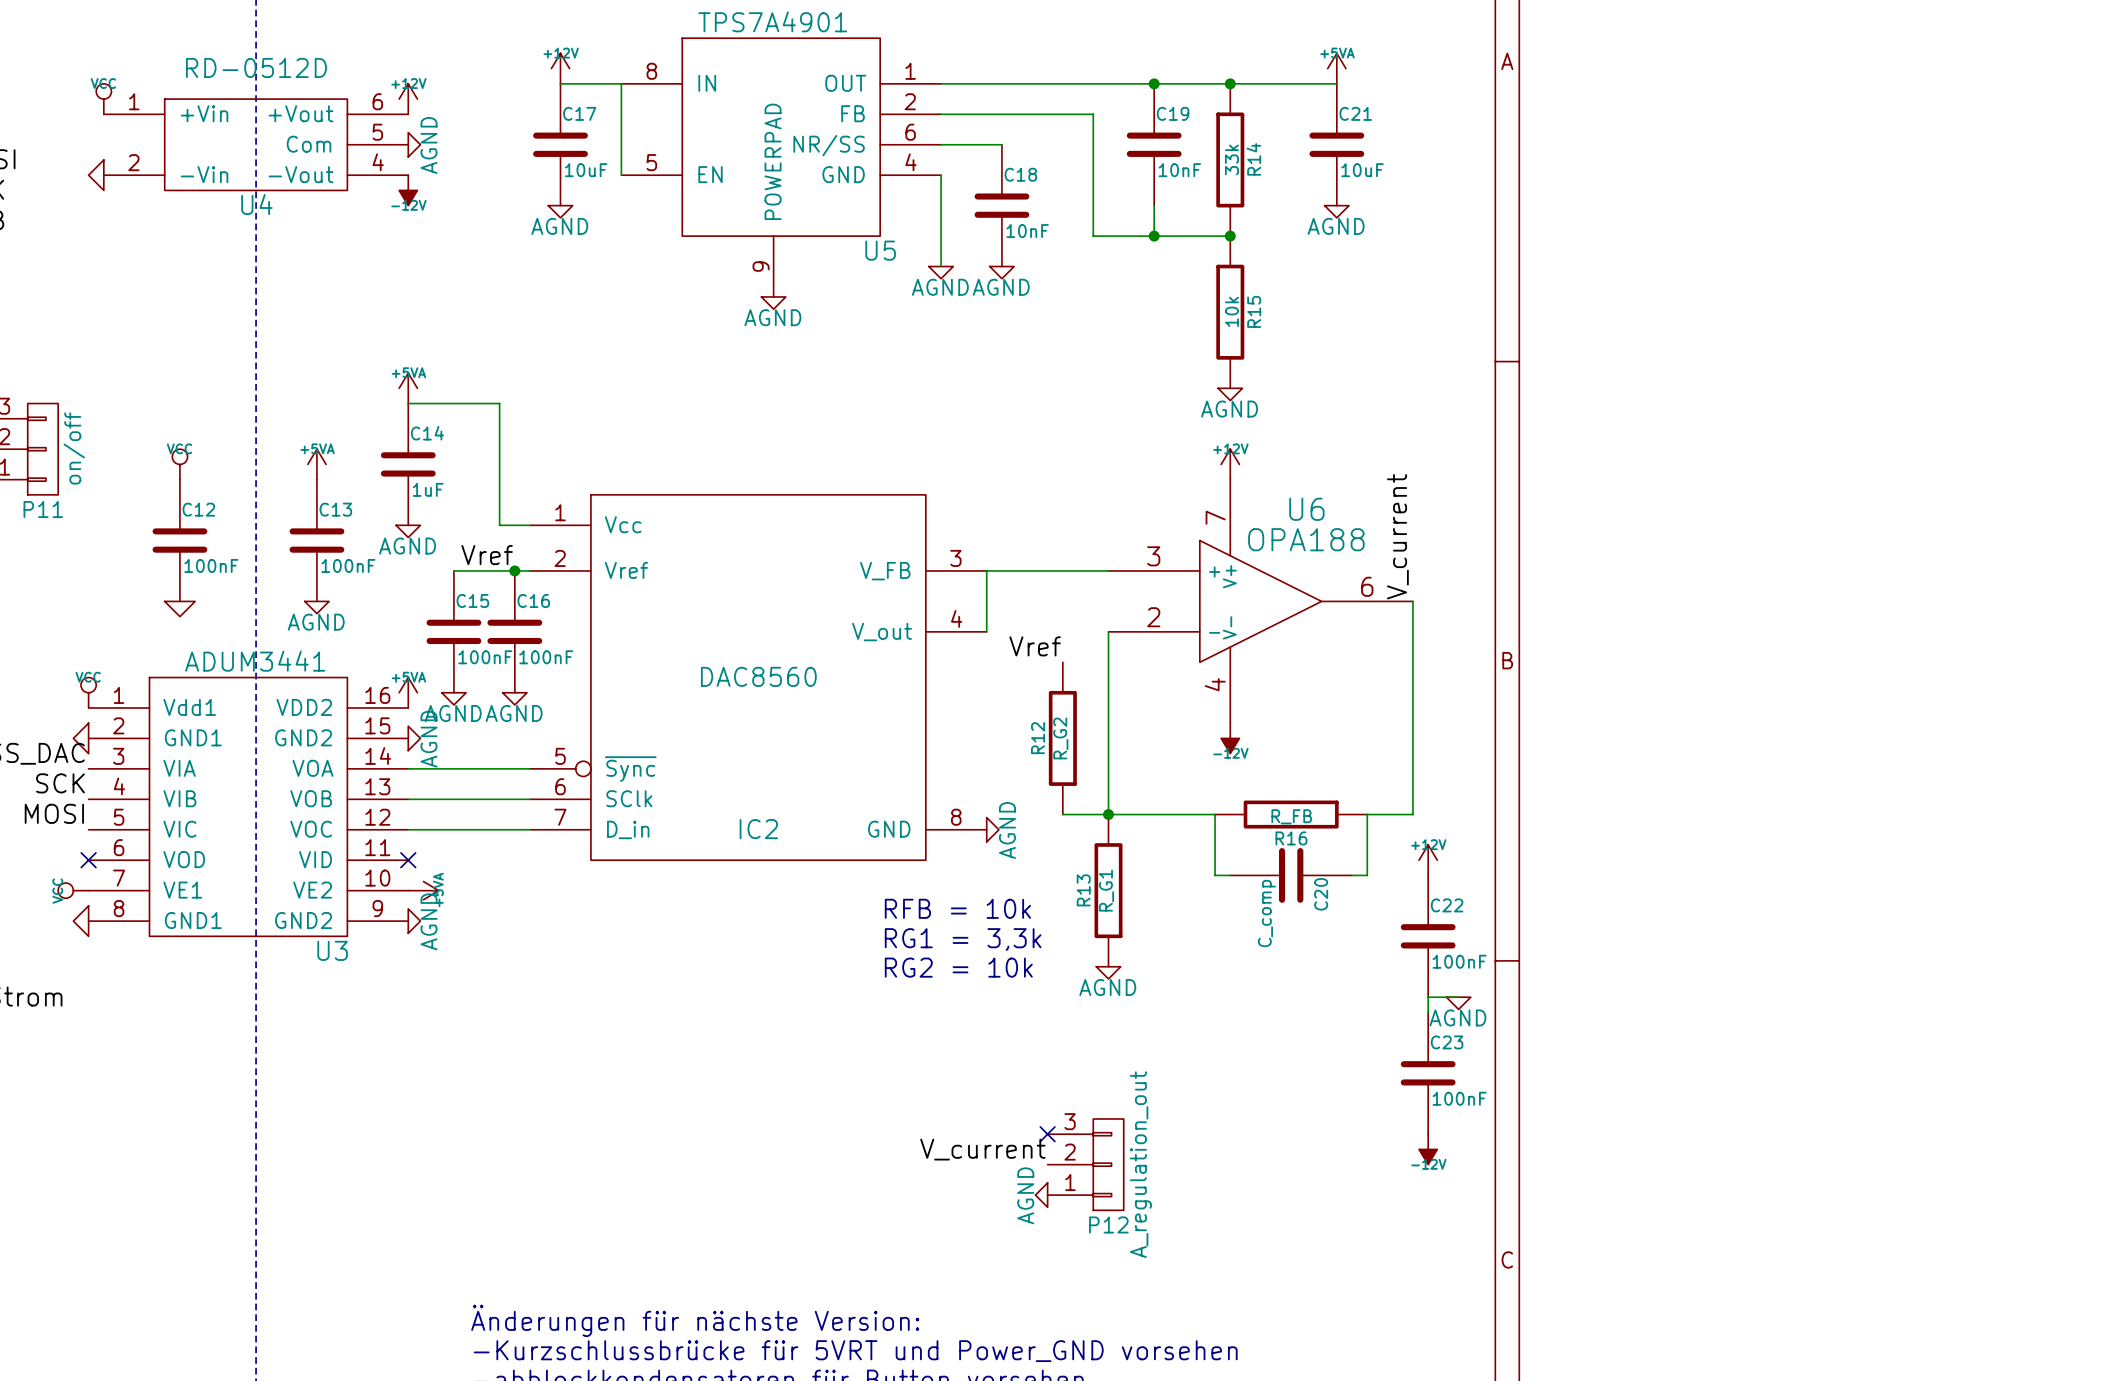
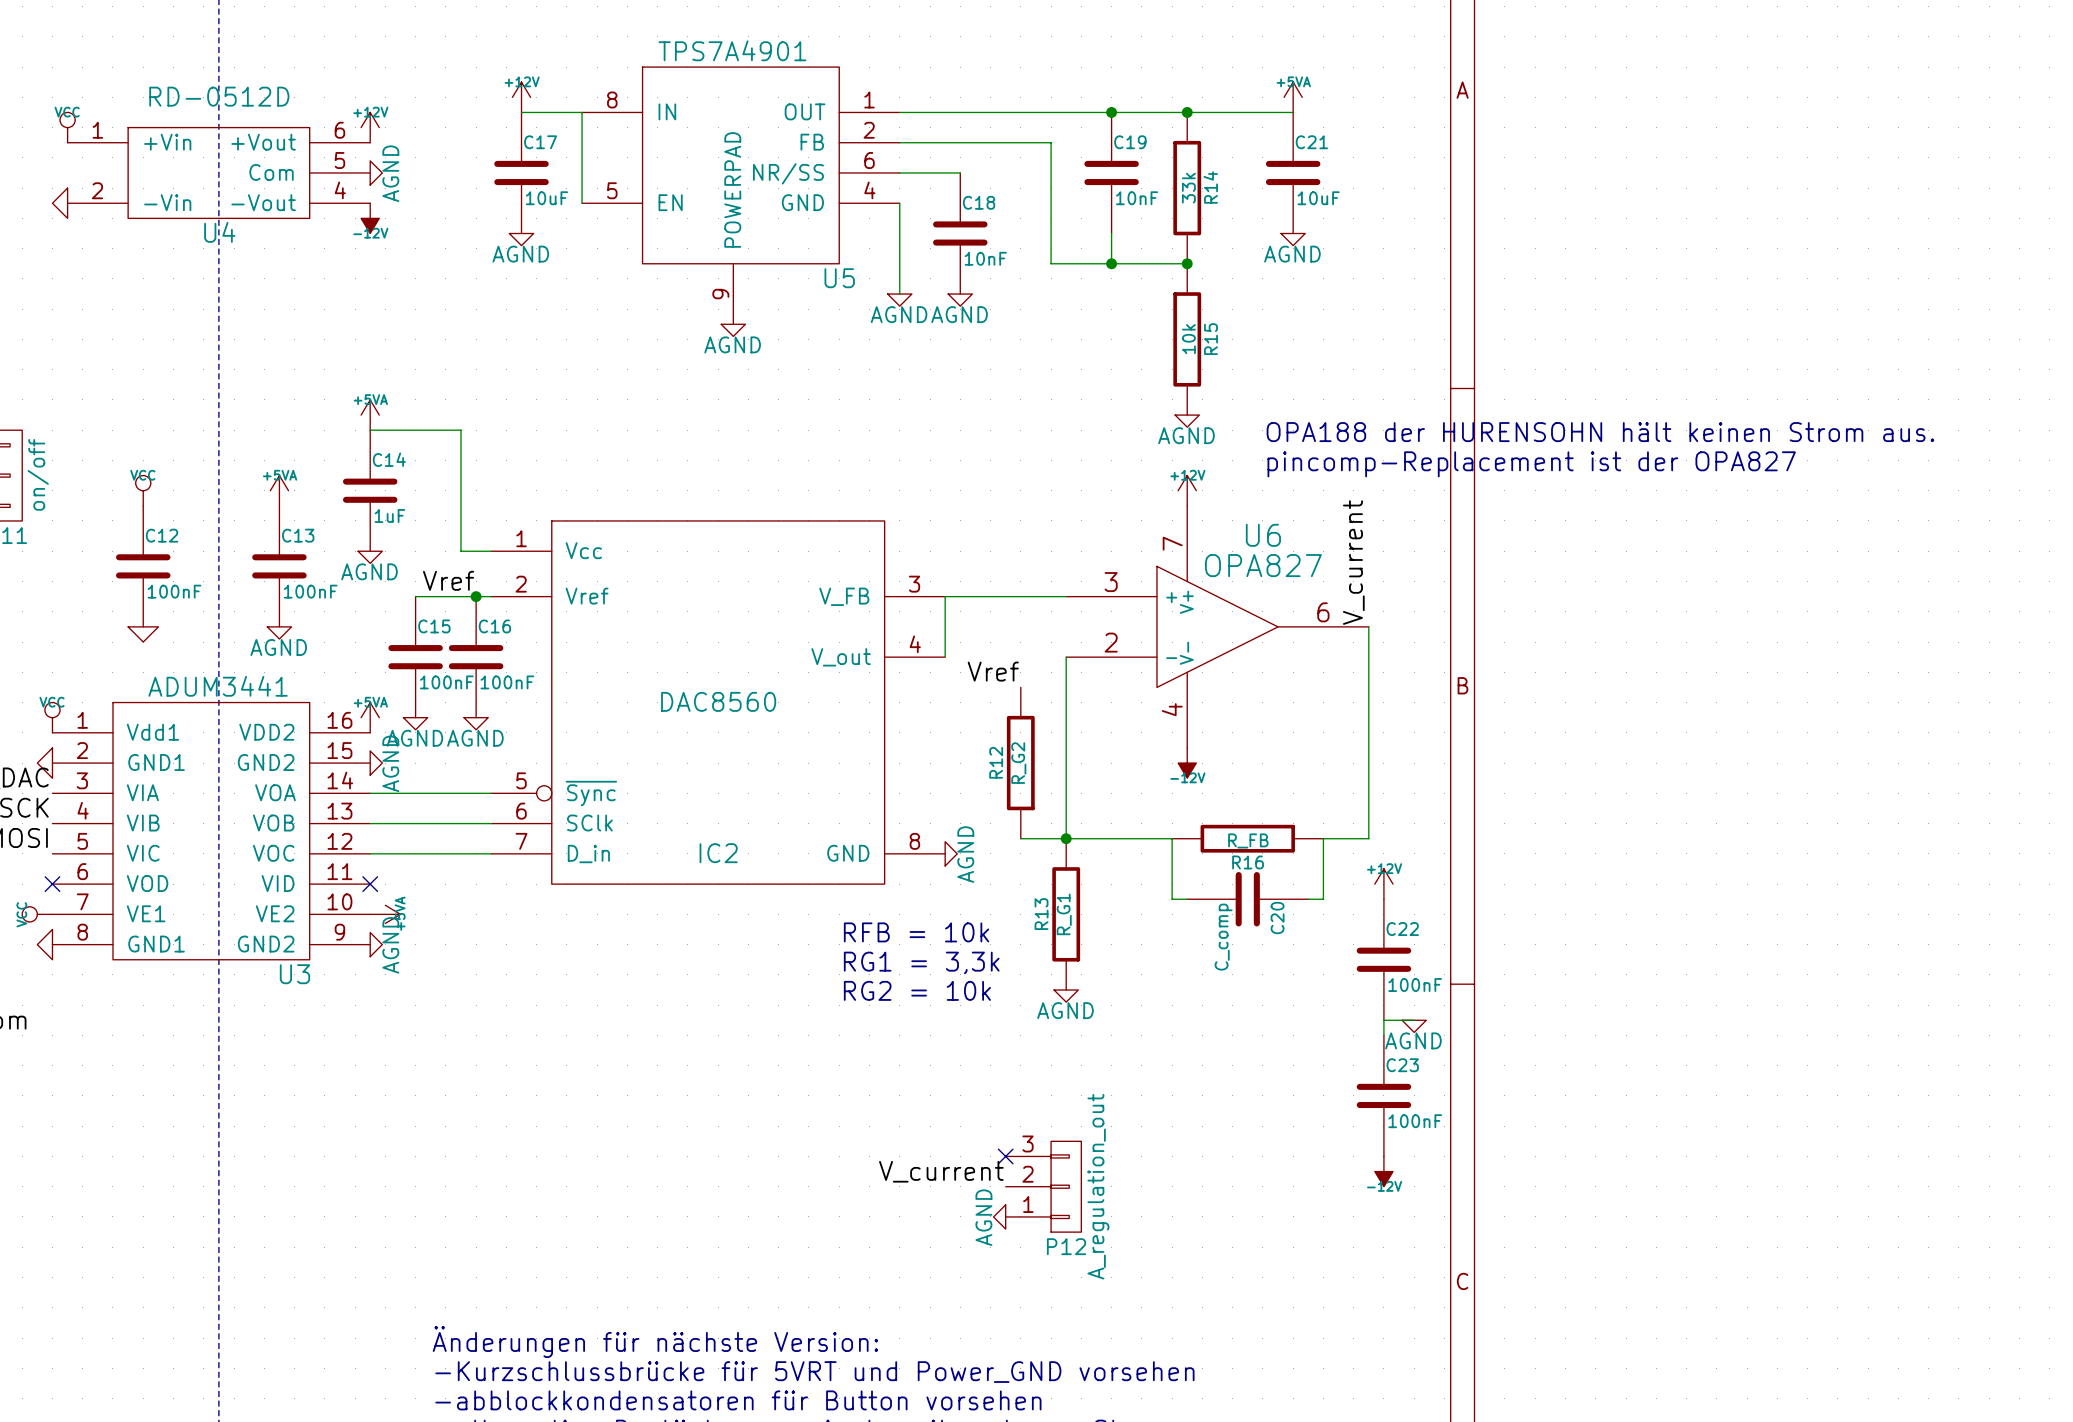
text: none -> OPA188 der HURENSOHN hält keinen Strom aus. (1600, 432)
text: none -> pincomp-Replacement ist der OPA827 (1531, 464)
U6 value: OPA188 (1306, 539) -> OPA827 (1263, 565)

